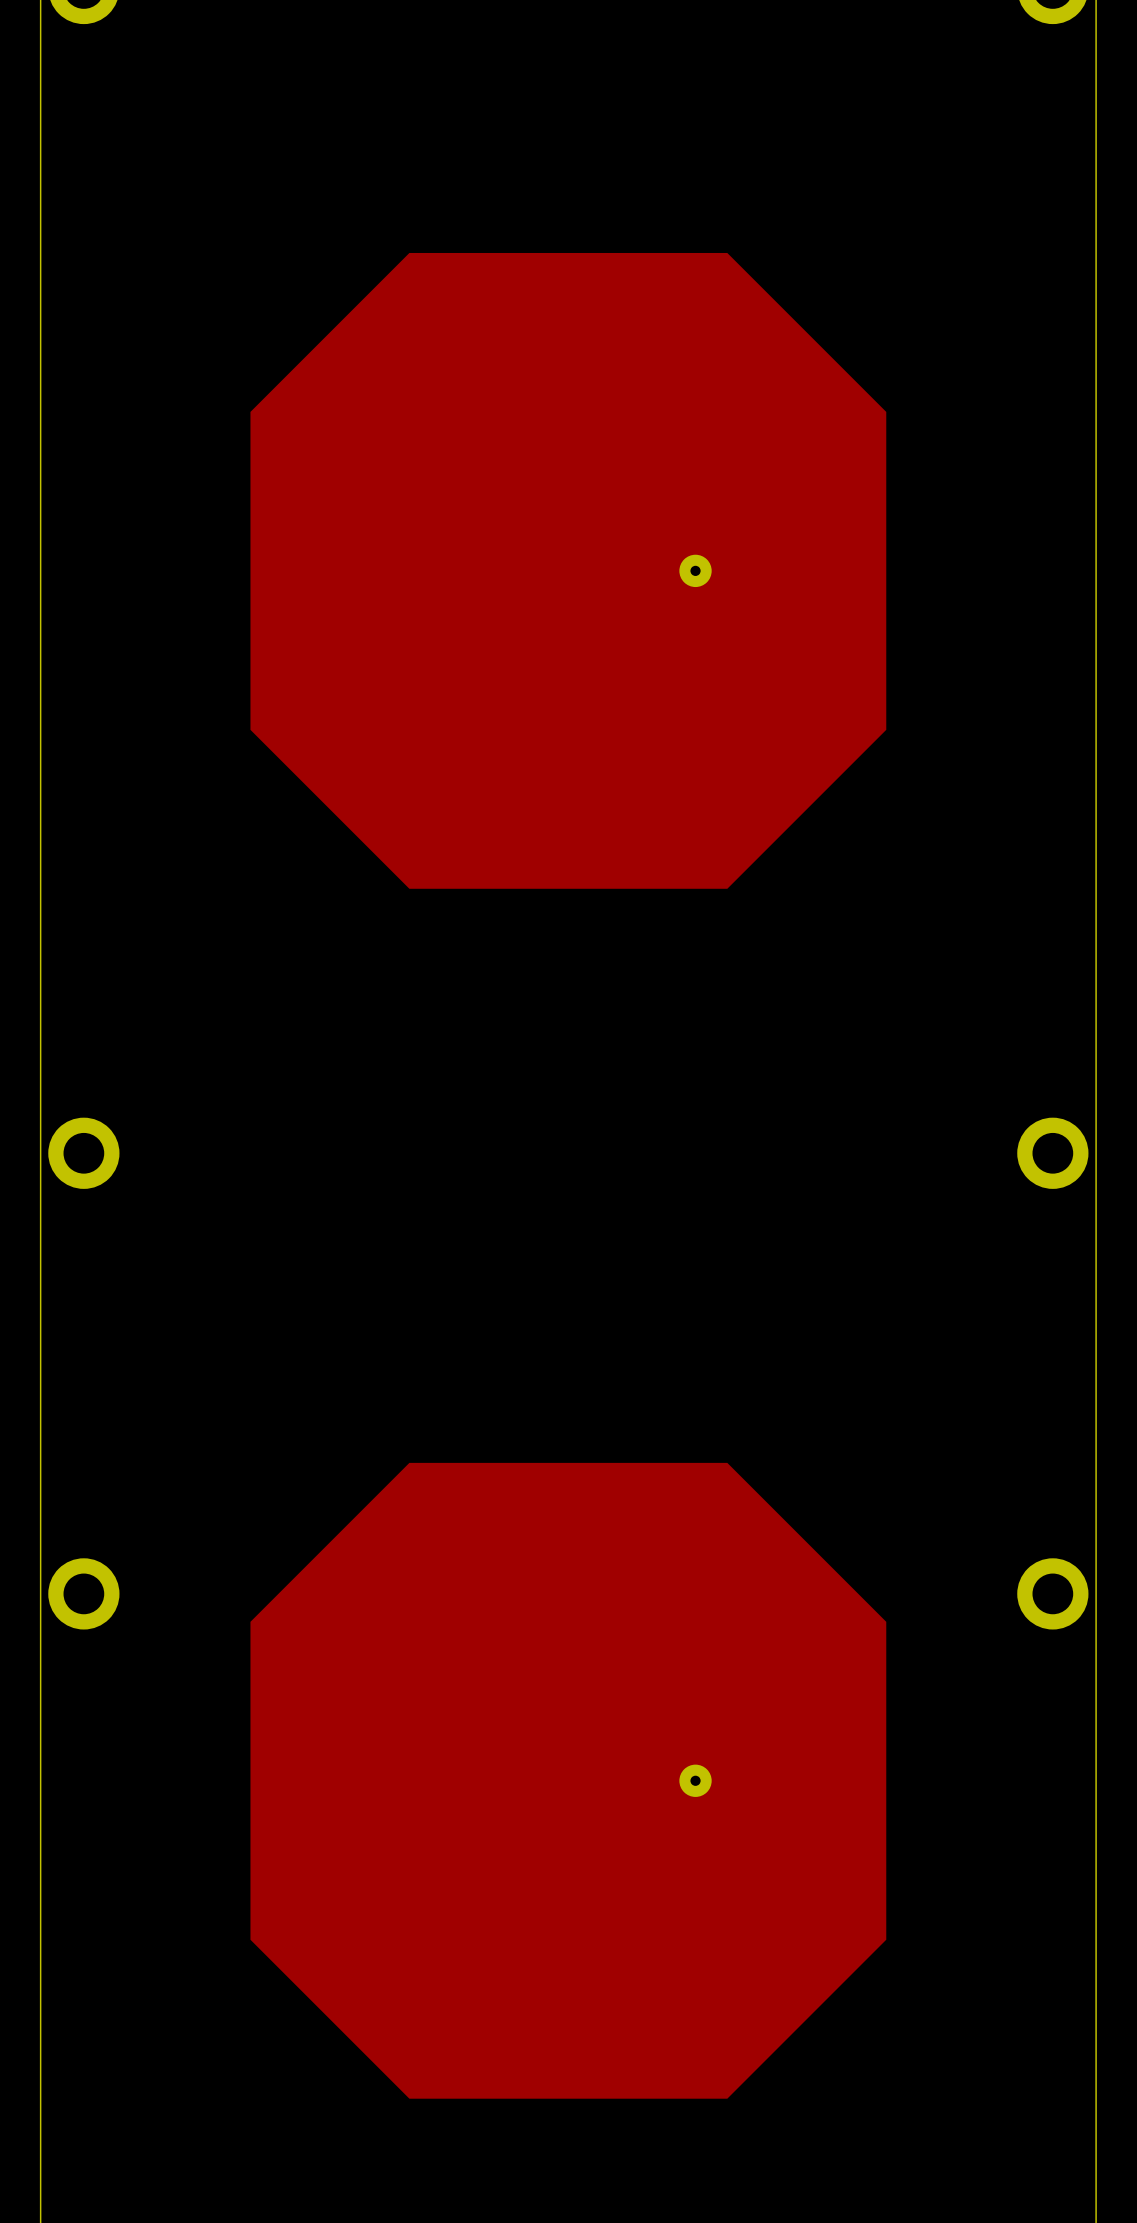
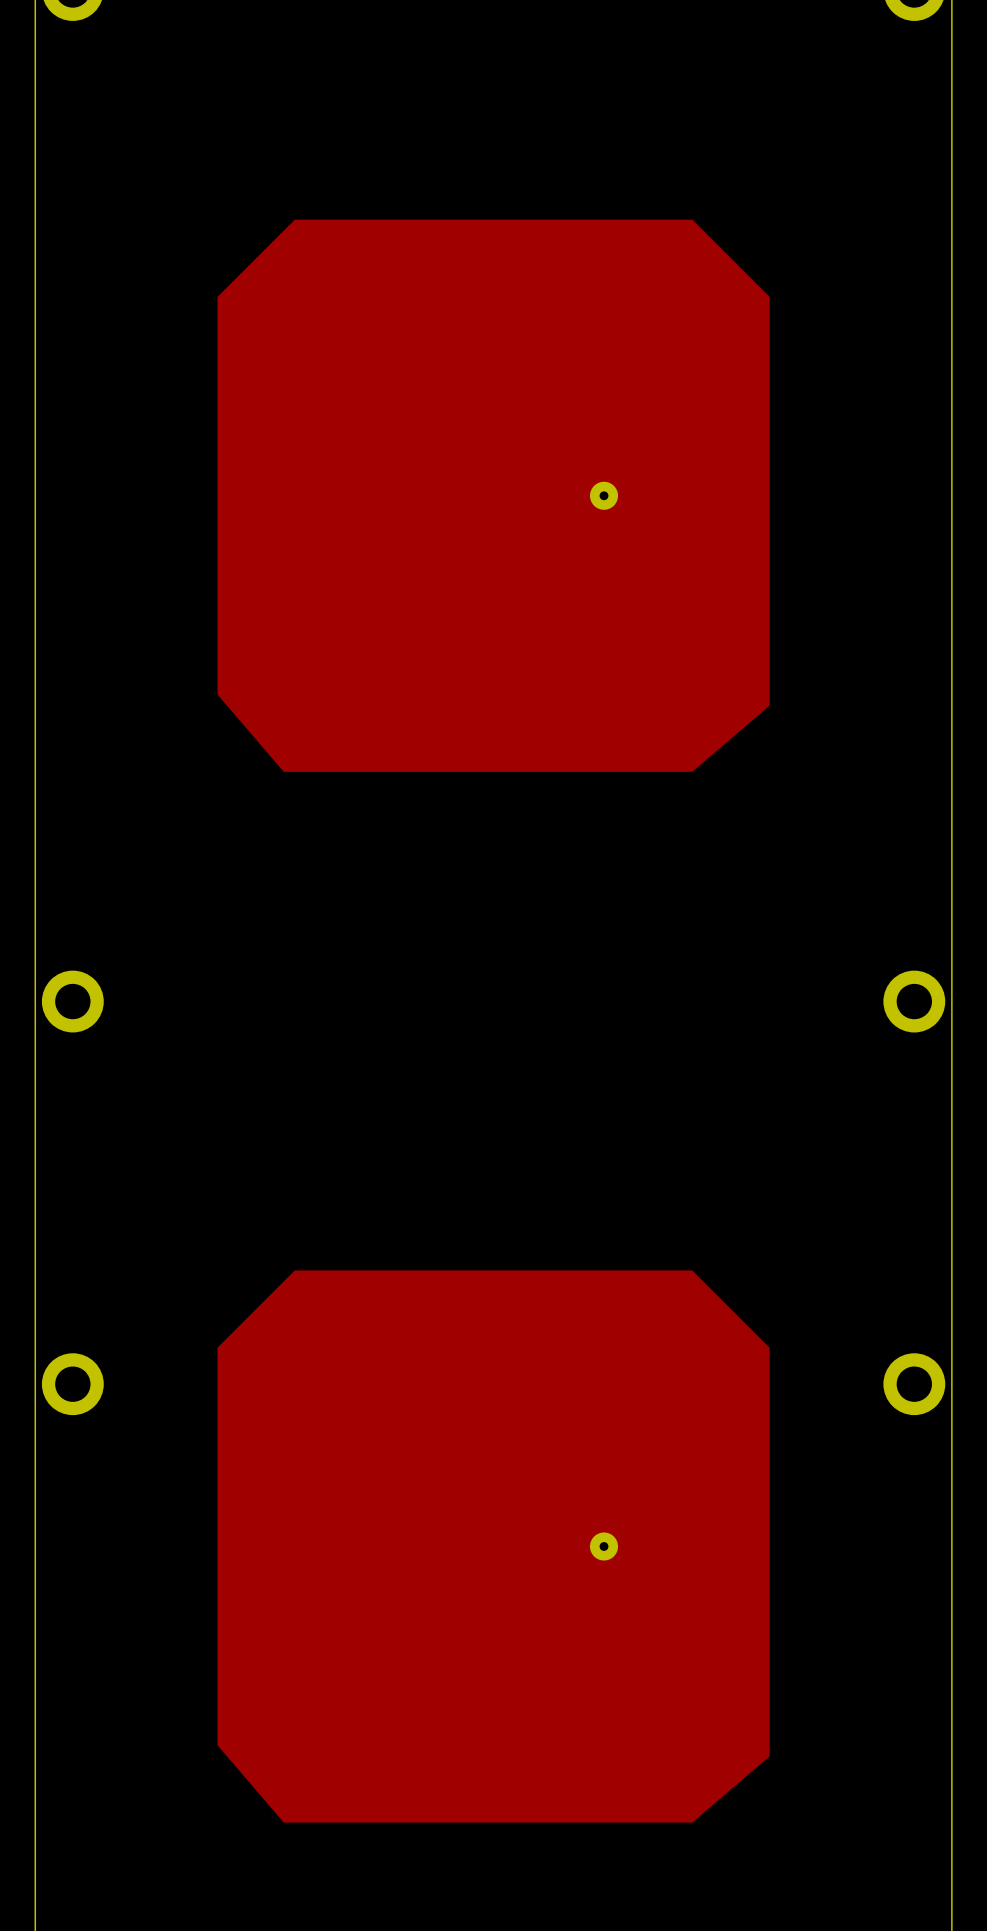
drawing shape: [250, 252, 887, 889] -> [217, 219, 770, 772]
drawing shape: [250, 1462, 887, 2099] -> [217, 1270, 770, 1823]

